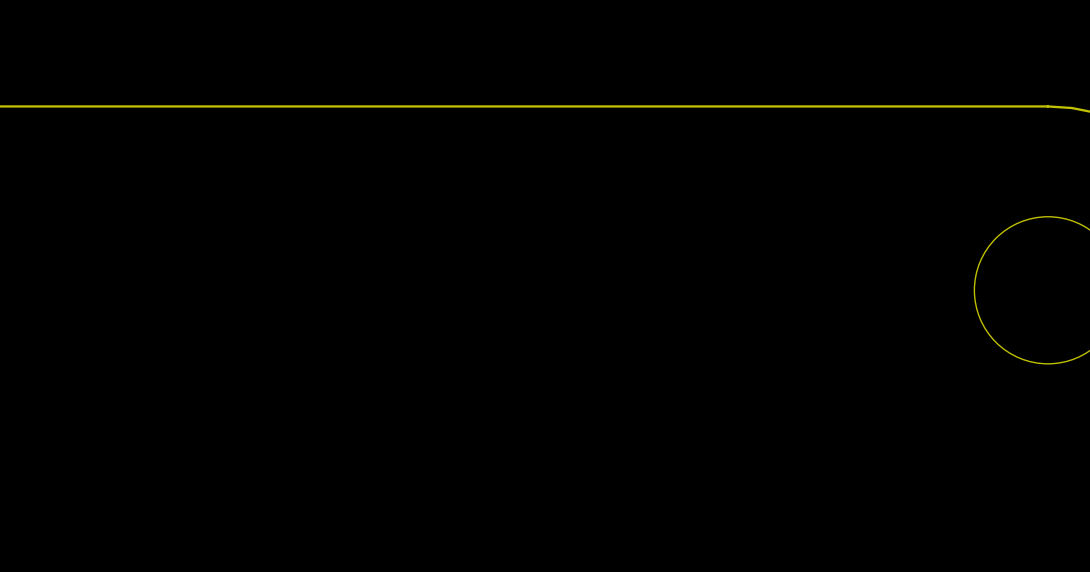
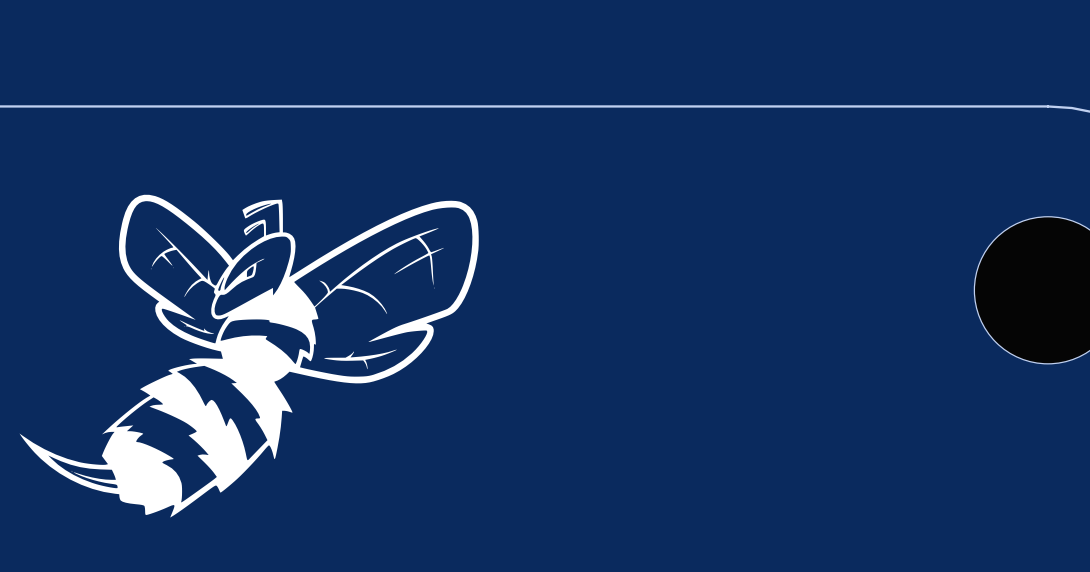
drawing: none -> [19, 194, 479, 518]

